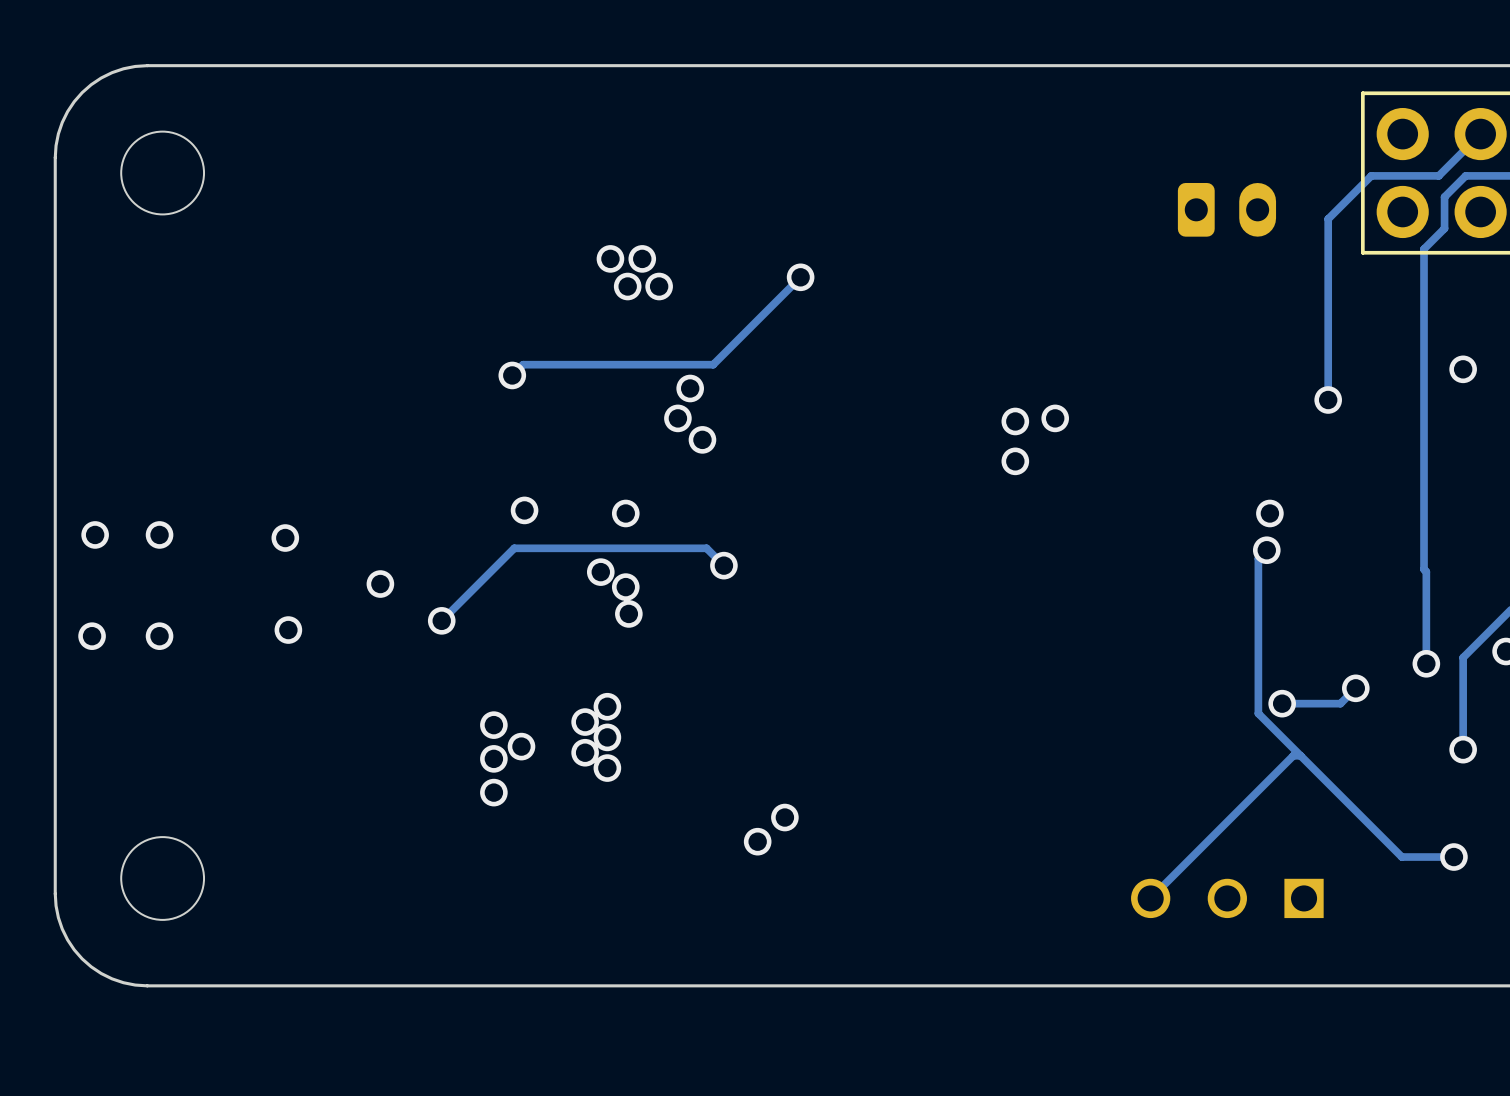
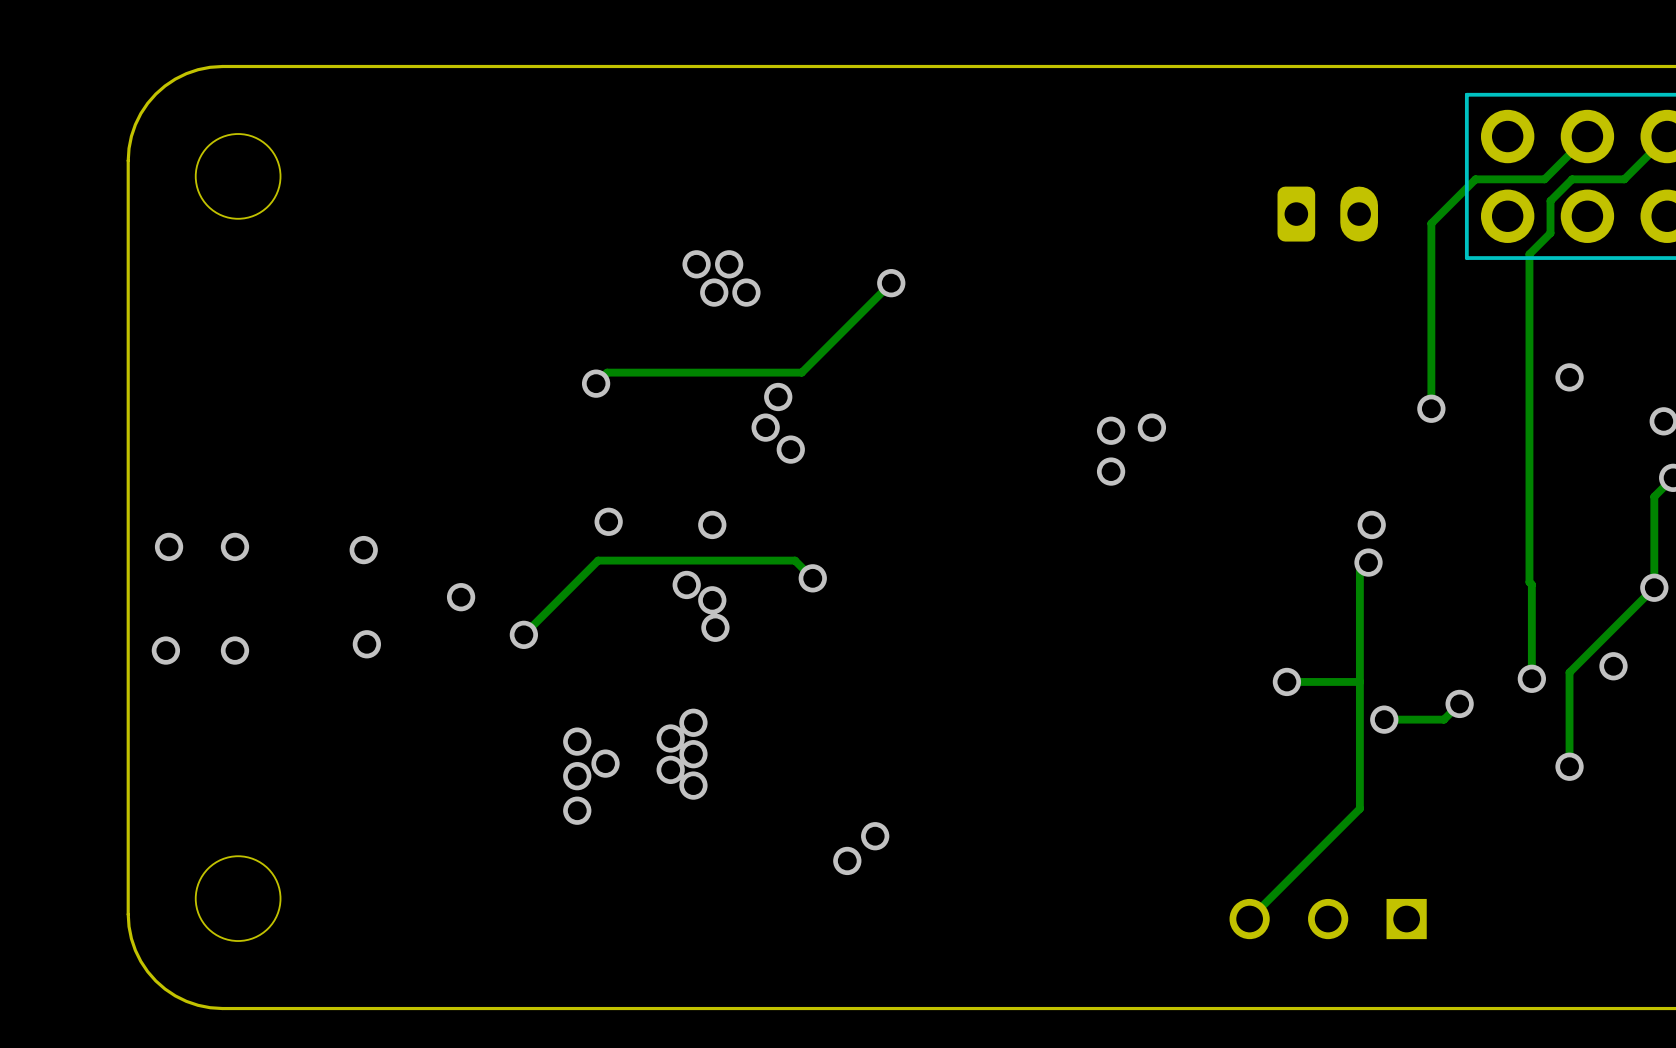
via: none -> (1286, 681)
track: none -> (1359, 681) (1286, 681)
track: (1258, 713) (1401, 857) (1453, 857) -> none
track: (1300, 755) (1293, 755) (1258, 790) -> (1359, 729) (1359, 808)
via: (1453, 857) -> none

